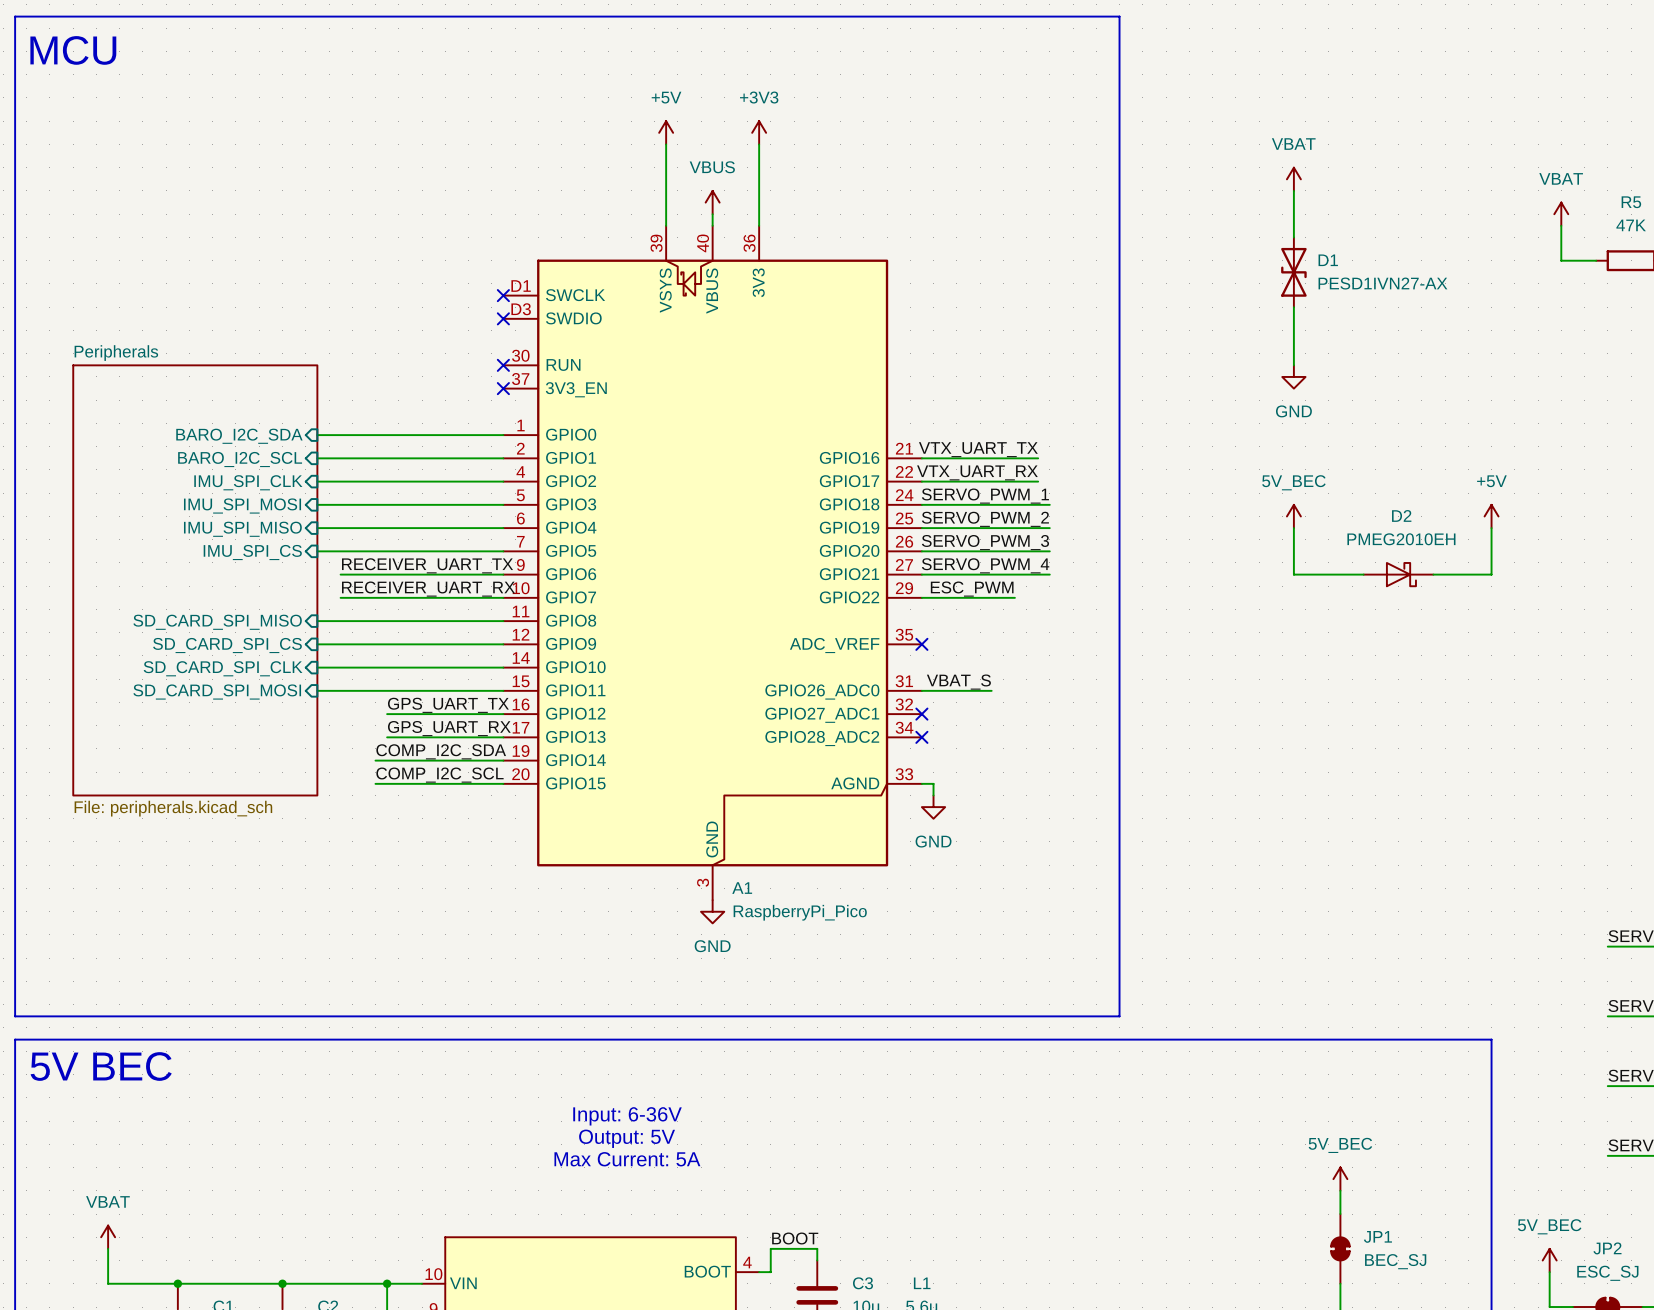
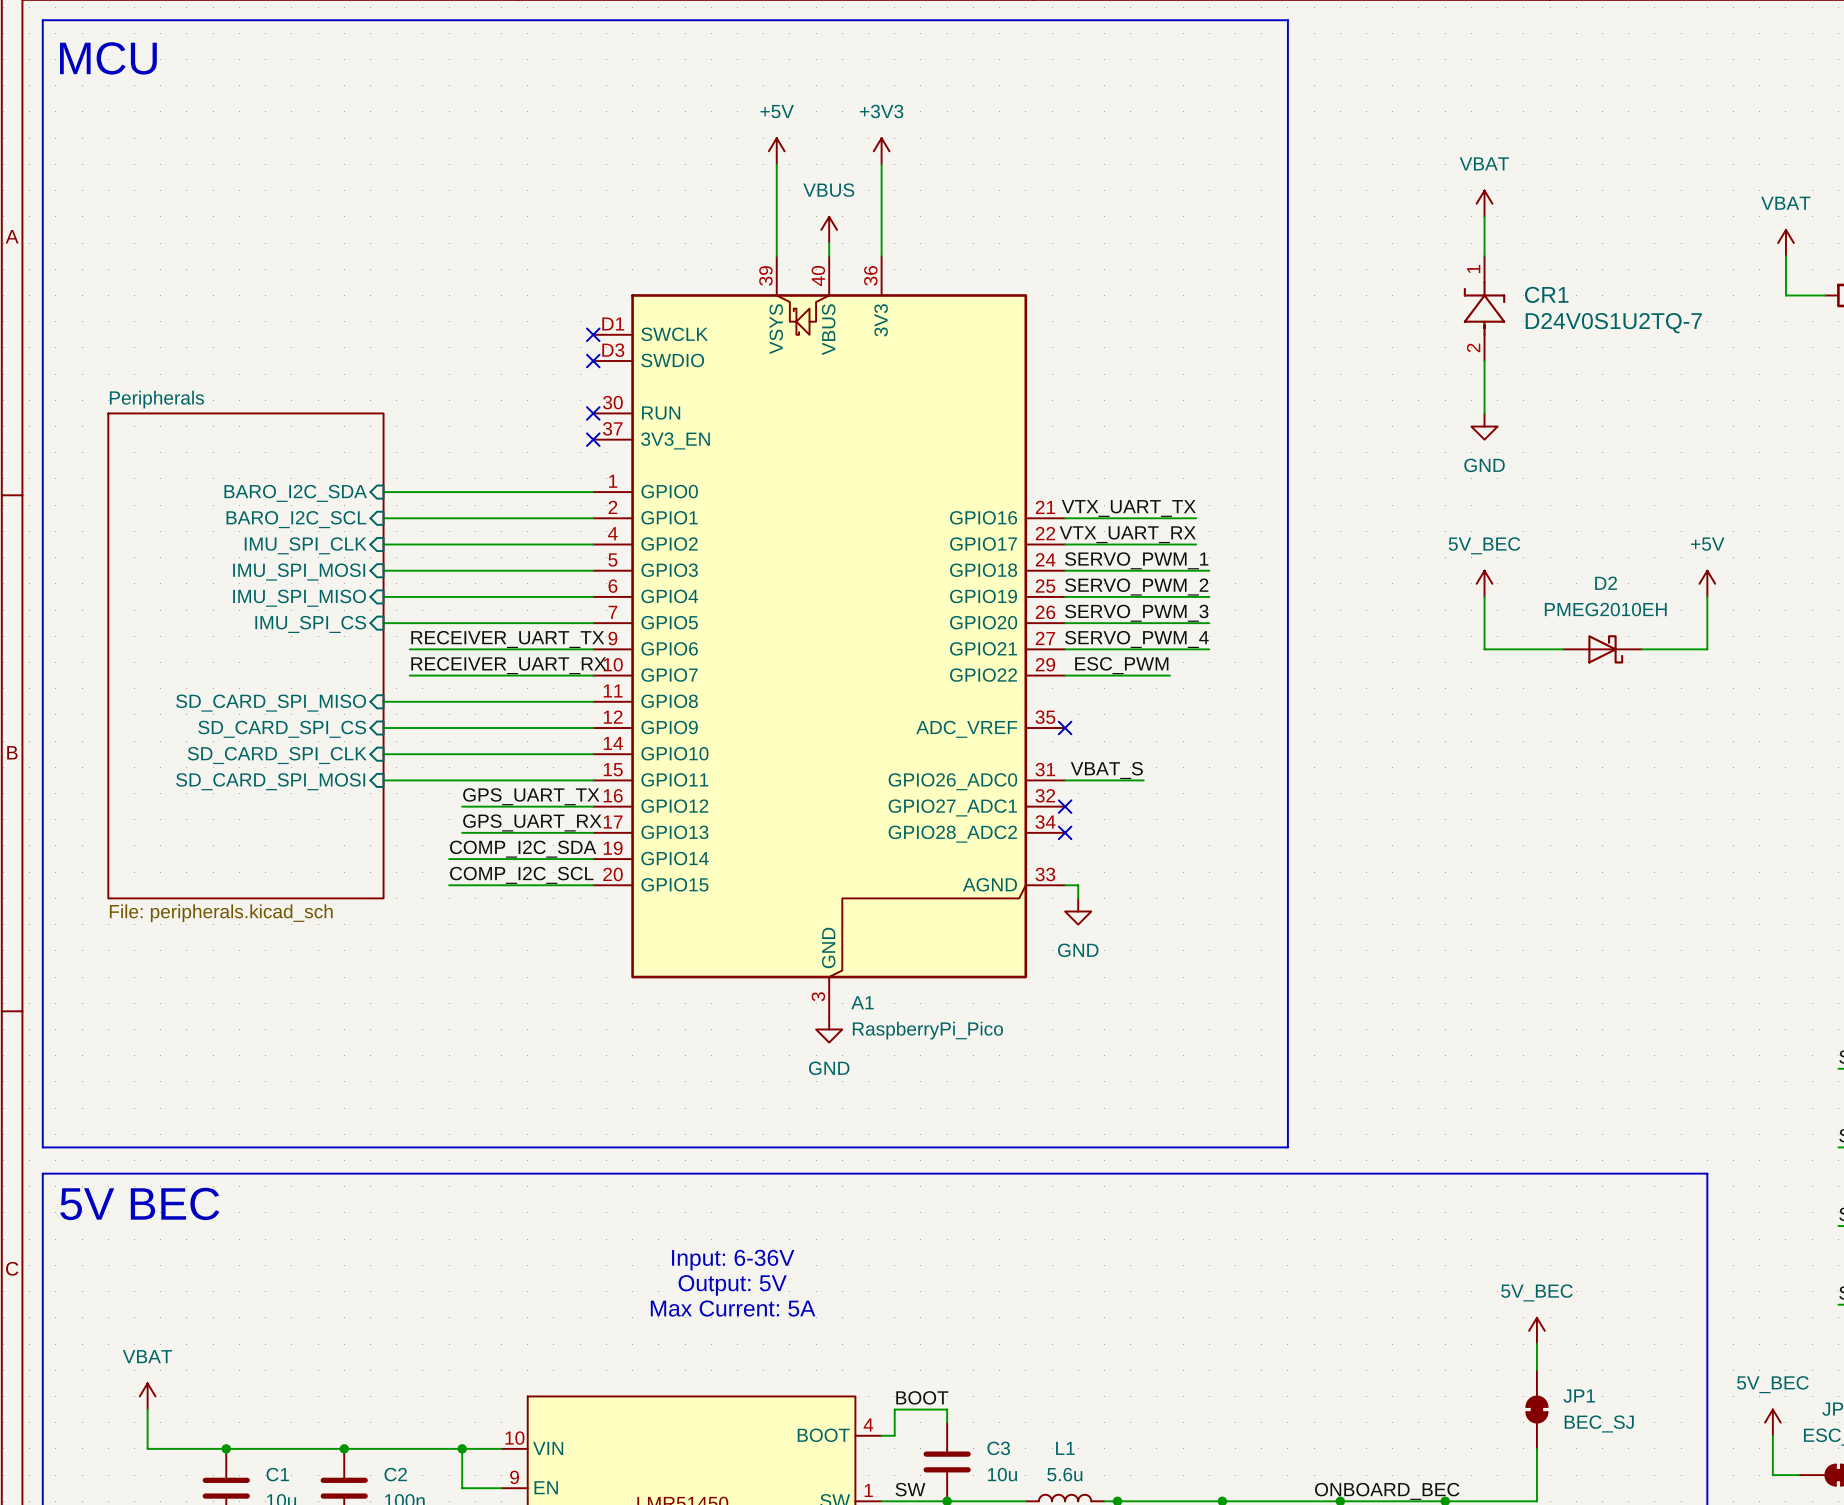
D1: PESD1IVN27-AX (1293, 272) -> none
CR1: none -> D24V0S1U2TQ-7 (1484, 308)

